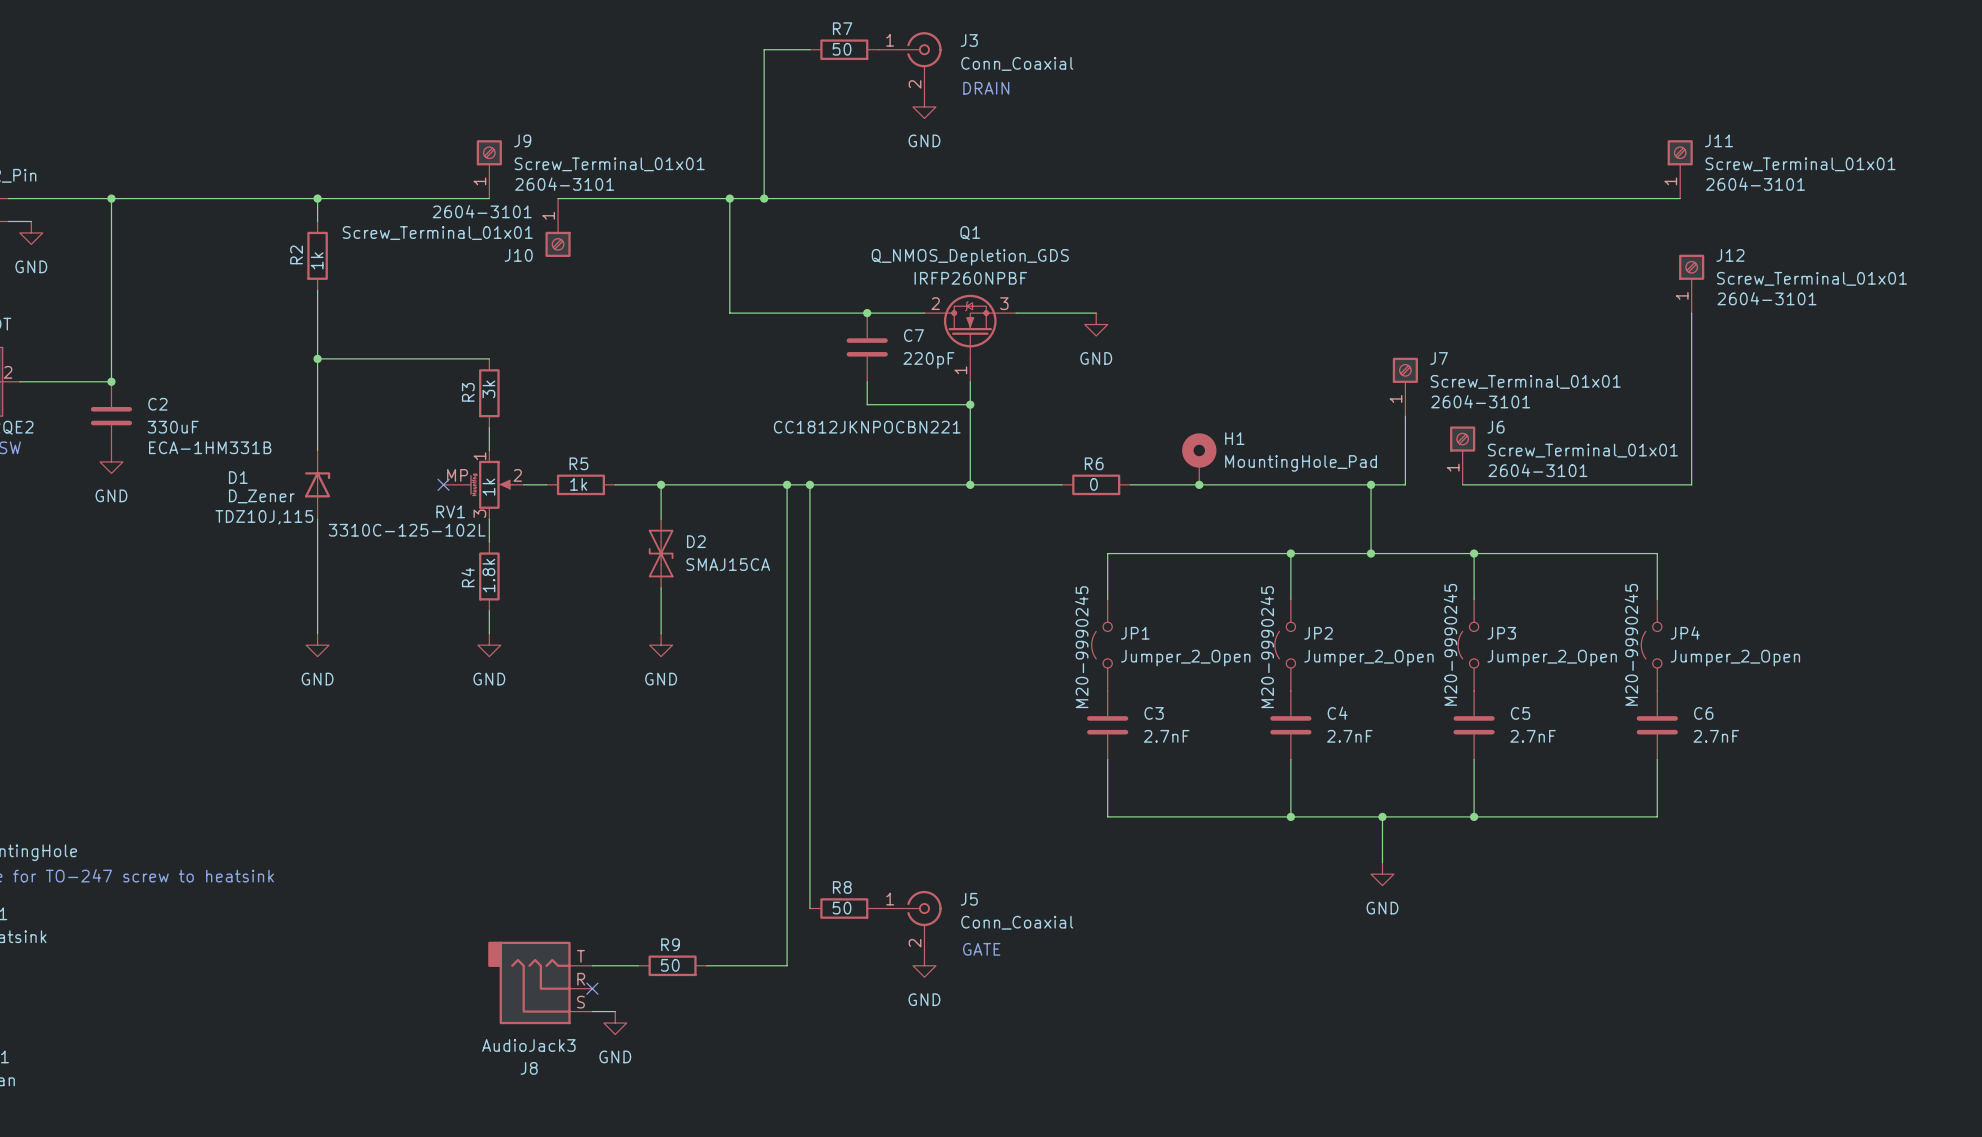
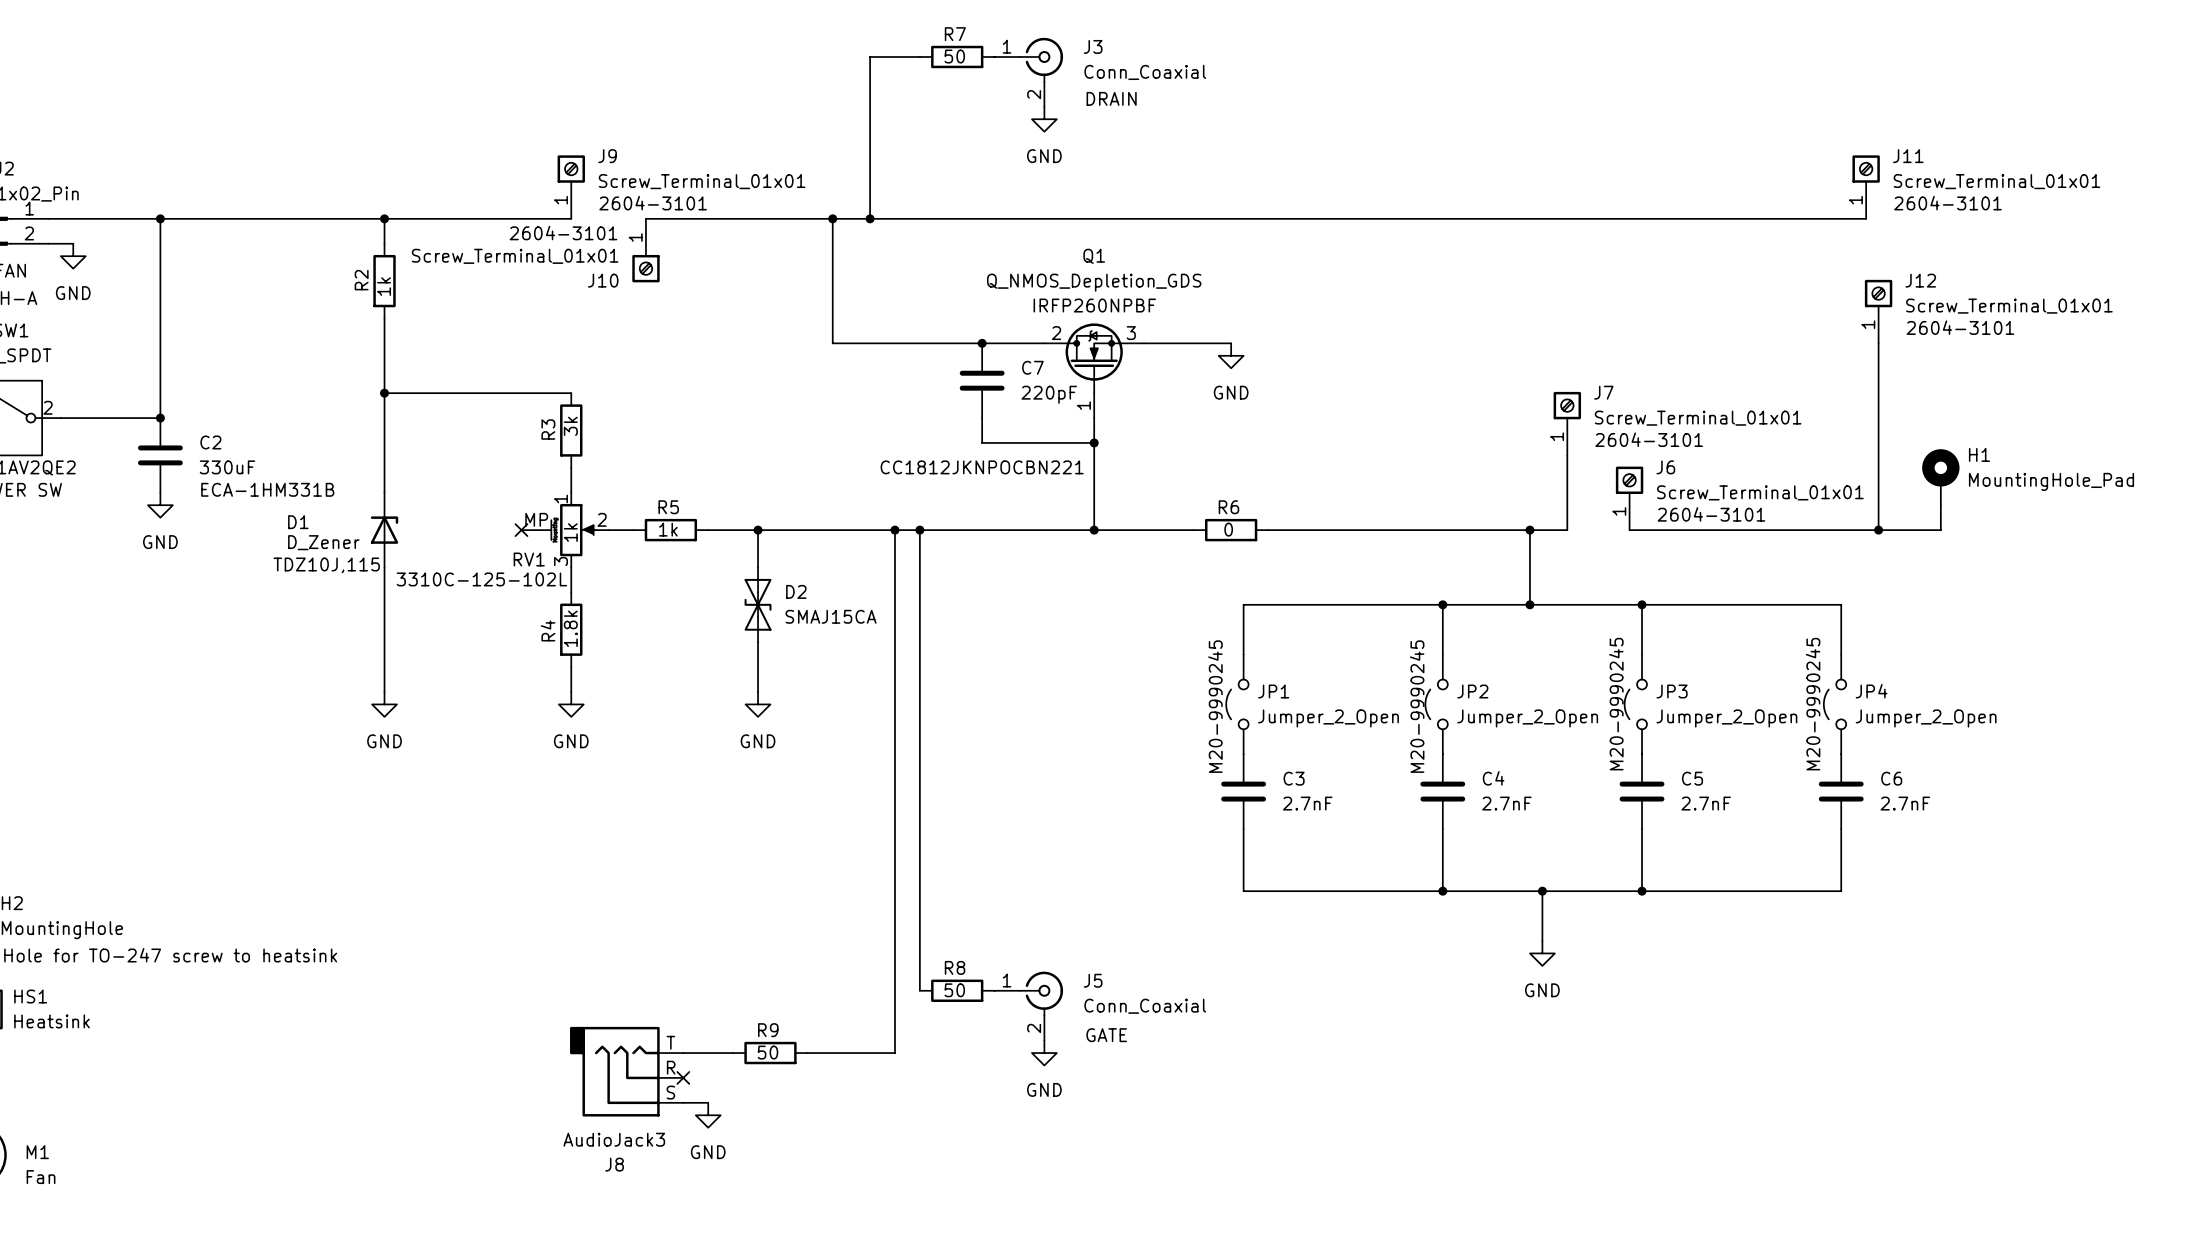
H1 position: (1199, 459) -> (1940, 477)
wire: none -> (1940, 505) (1940, 530) (1878, 530)
junction: (1199, 484) -> none
junction: none -> (1878, 530)

